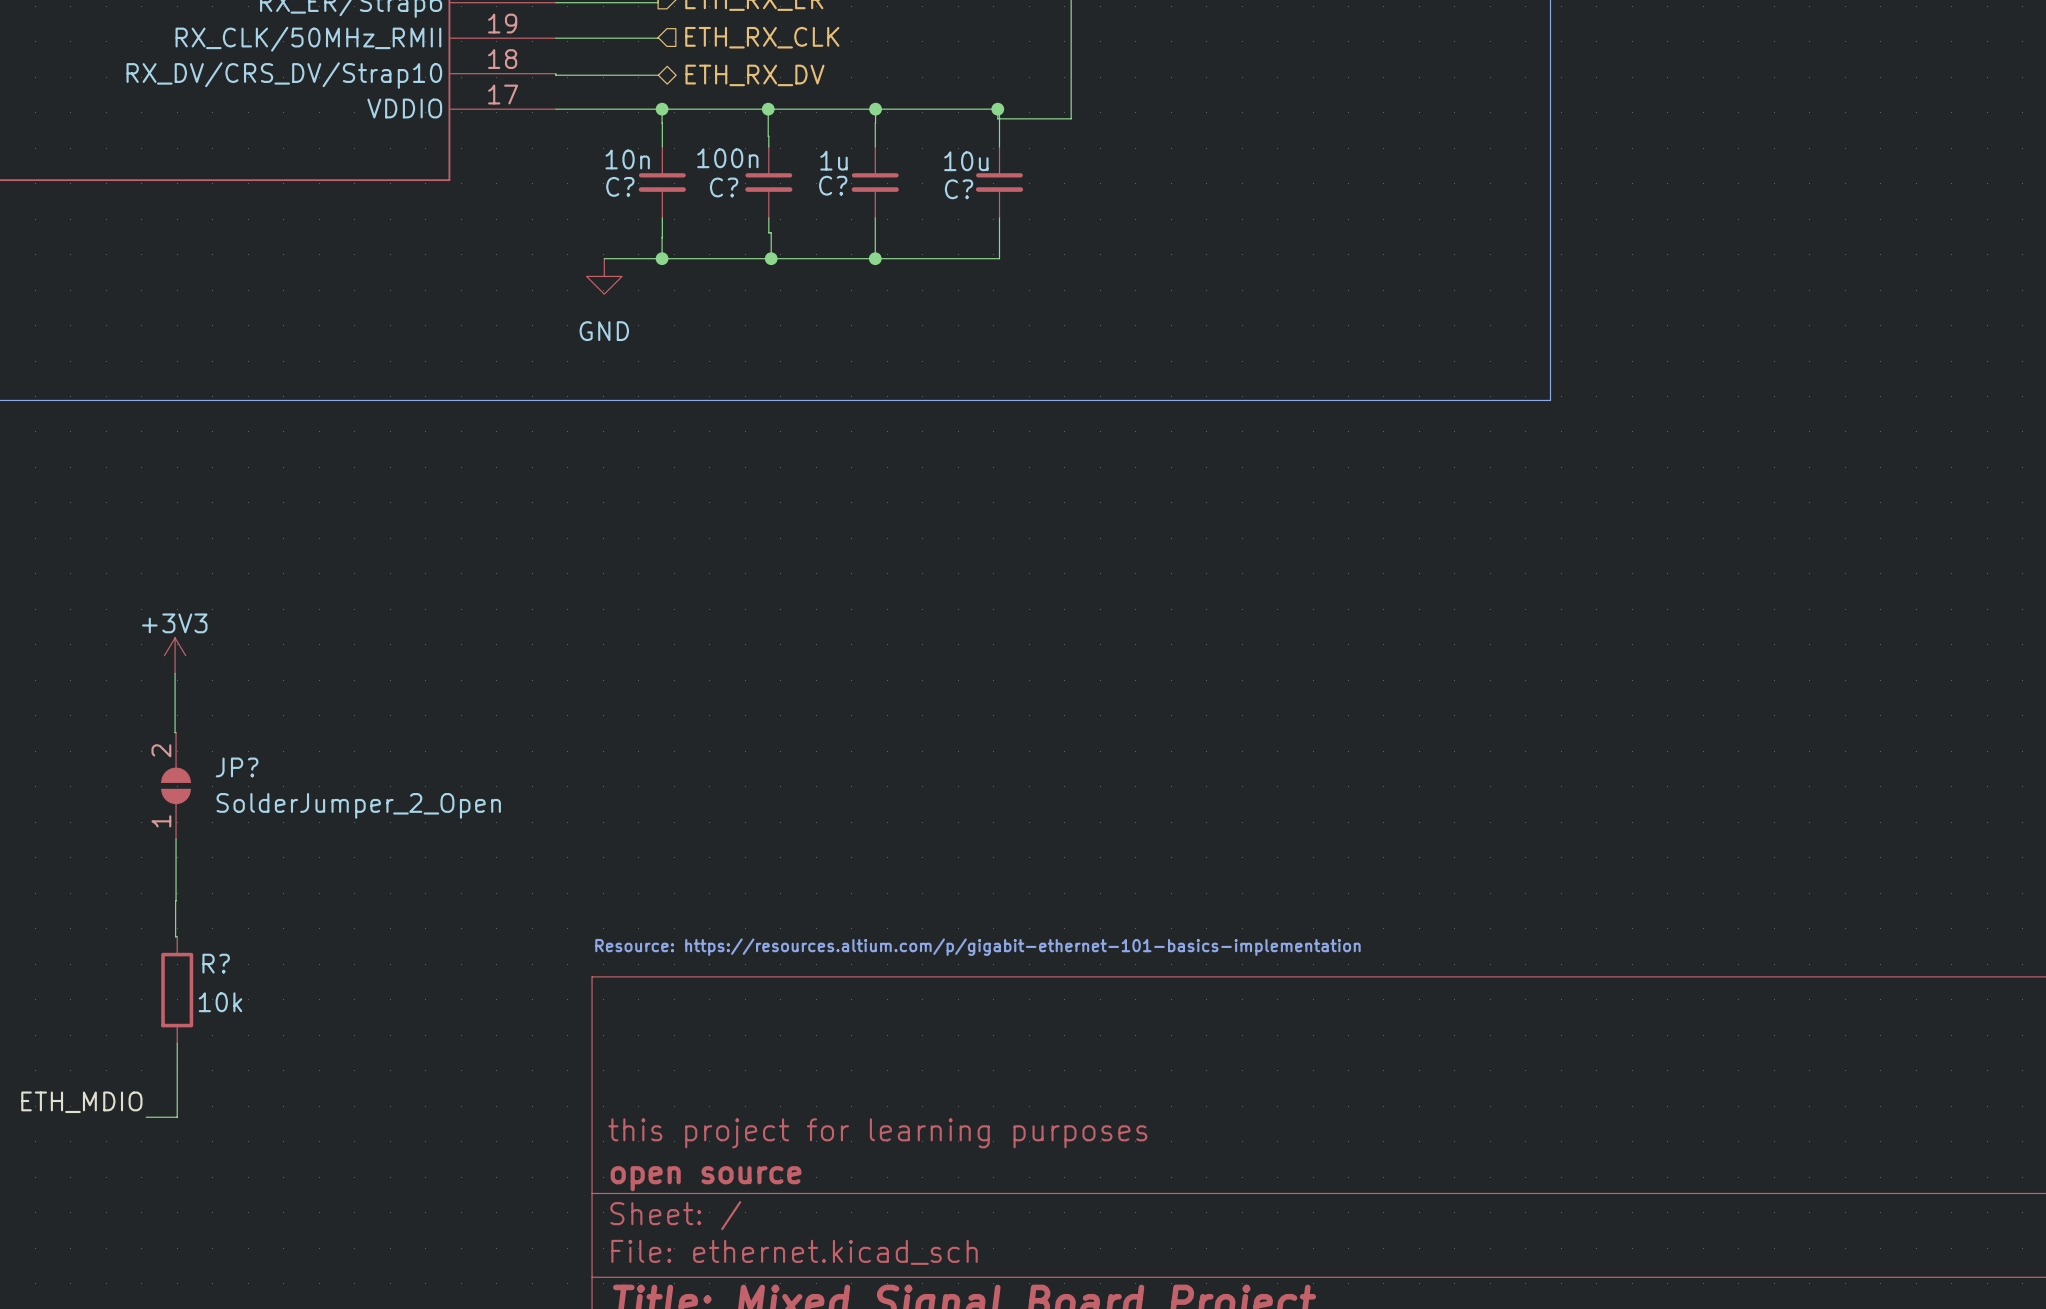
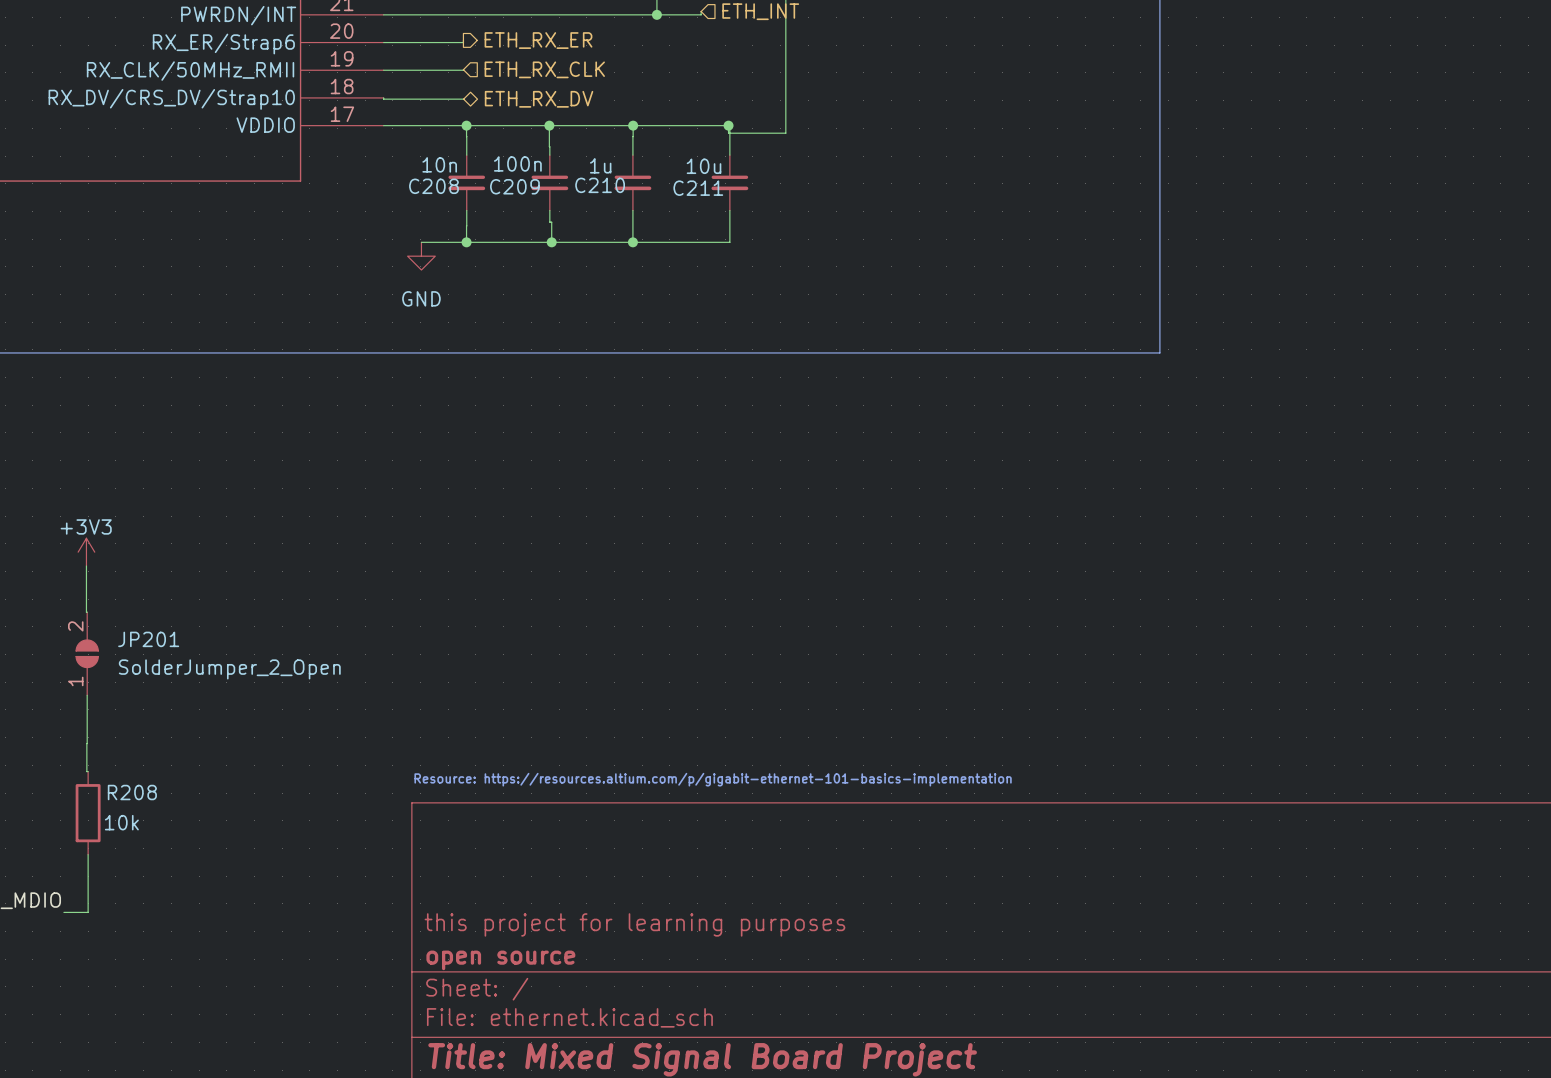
C? name: C? (833, 185) -> C210 (600, 185)
C? name: C? (620, 186) -> C208 (433, 186)
C? name: C? (724, 187) -> C209 (514, 186)
C? name: C? (959, 189) -> C211 (698, 188)
JP? name: JP? (237, 767) -> JP201 (148, 639)
R? name: R? (216, 963) -> R208 (132, 792)

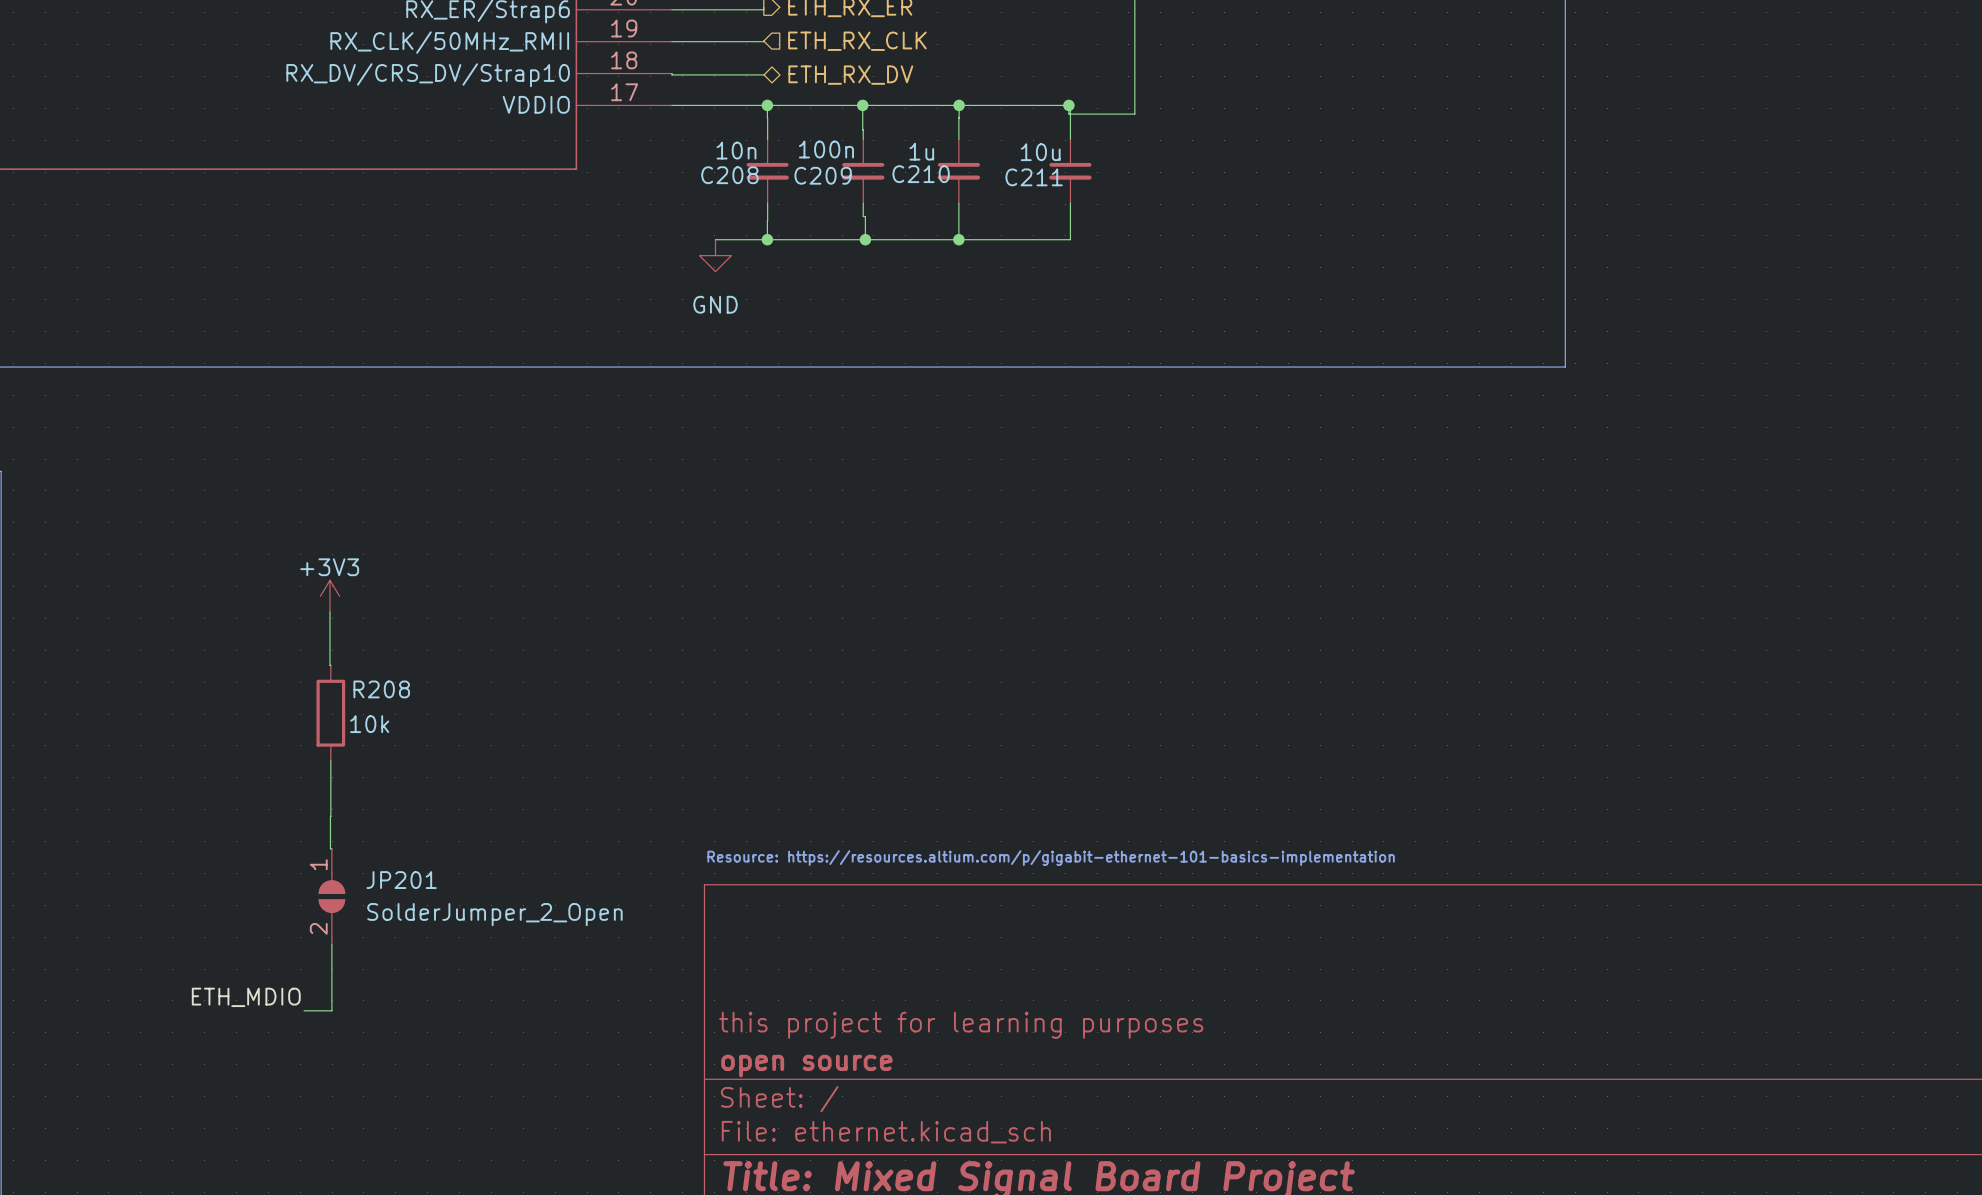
JP201 rotation: 0° (87, 653) -> 180° (331, 896)
JP201 position: (87, 653) -> (331, 896)
R208 position: (88, 813) -> (330, 713)

